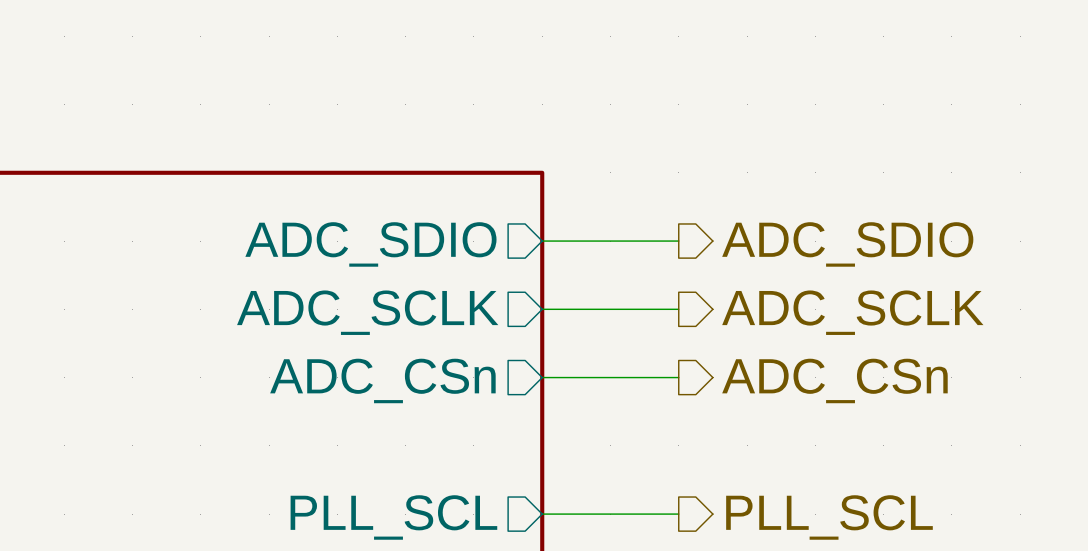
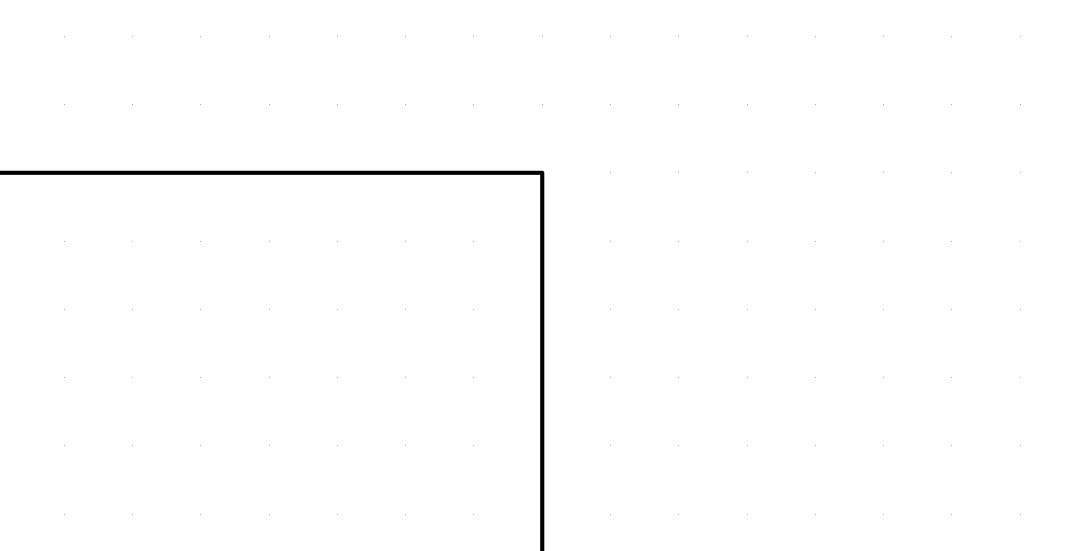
wire: (542, 241) (678, 241) -> none
sheet pin: ADC_SDIO (370, 244) -> none
hierarchical label: ADC_SDIO (847, 244) -> none
wire: (542, 309) (678, 309) -> none
sheet pin: ADC_SCLK (367, 312) -> none
hierarchical label: ADC_SCLK (852, 312) -> none
wire: (542, 377) (678, 377) -> none
sheet pin: ADC_CSn (382, 380) -> none
hierarchical label: ADC_CSn (834, 380) -> none
wire: (542, 514) (678, 514) -> none
sheet pin: PLL_SCL (393, 517) -> none
hierarchical label: PLL_SCL (829, 517) -> none

